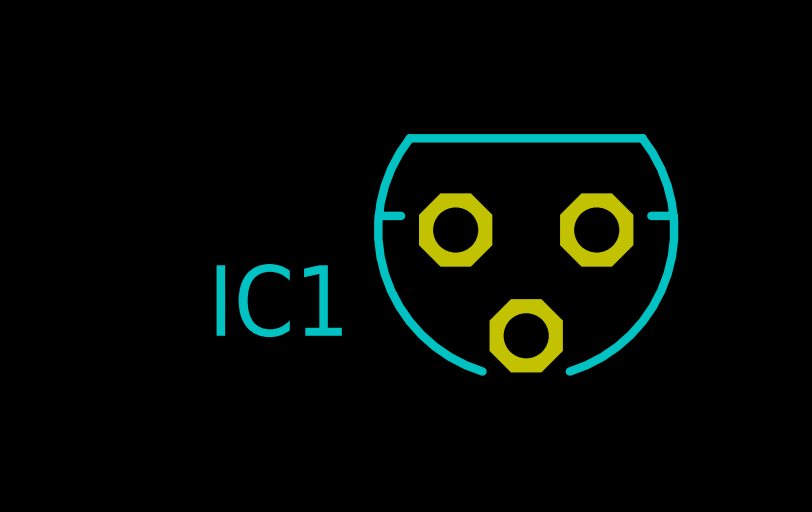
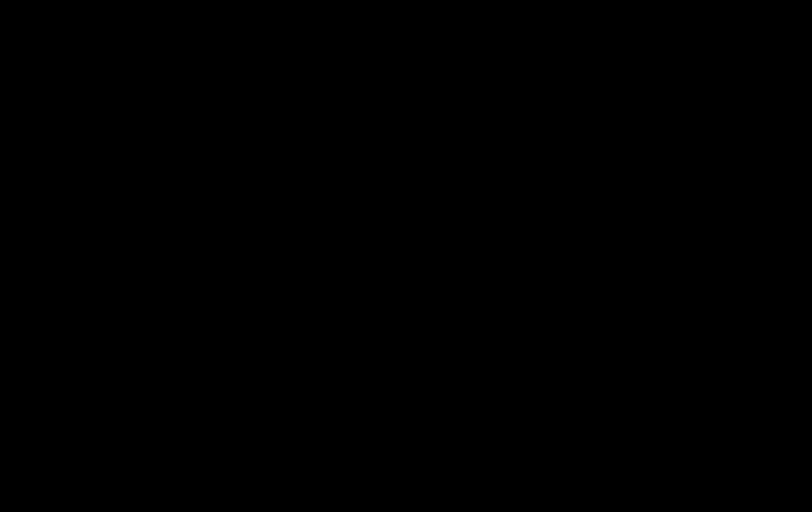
IC1: (526, 254) -> none

